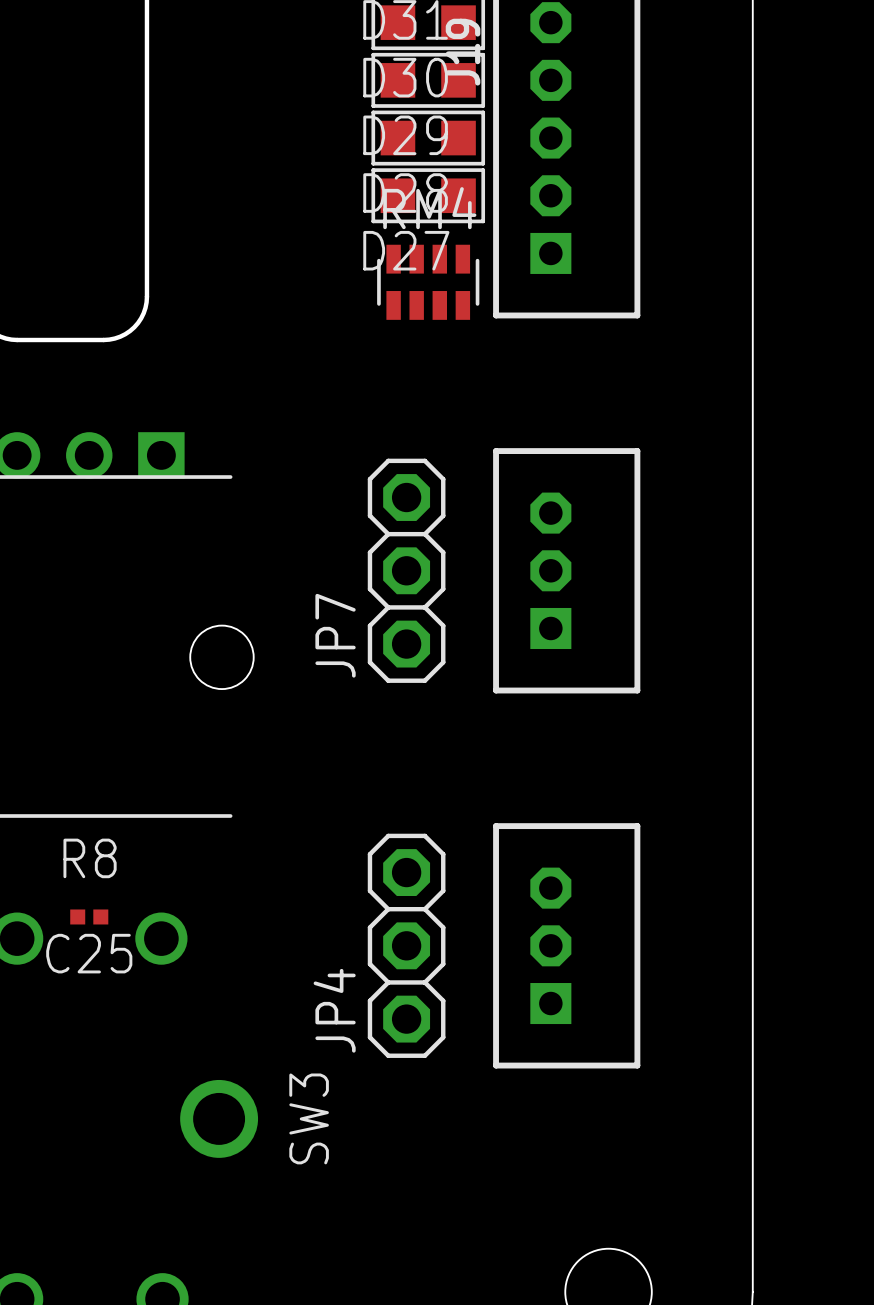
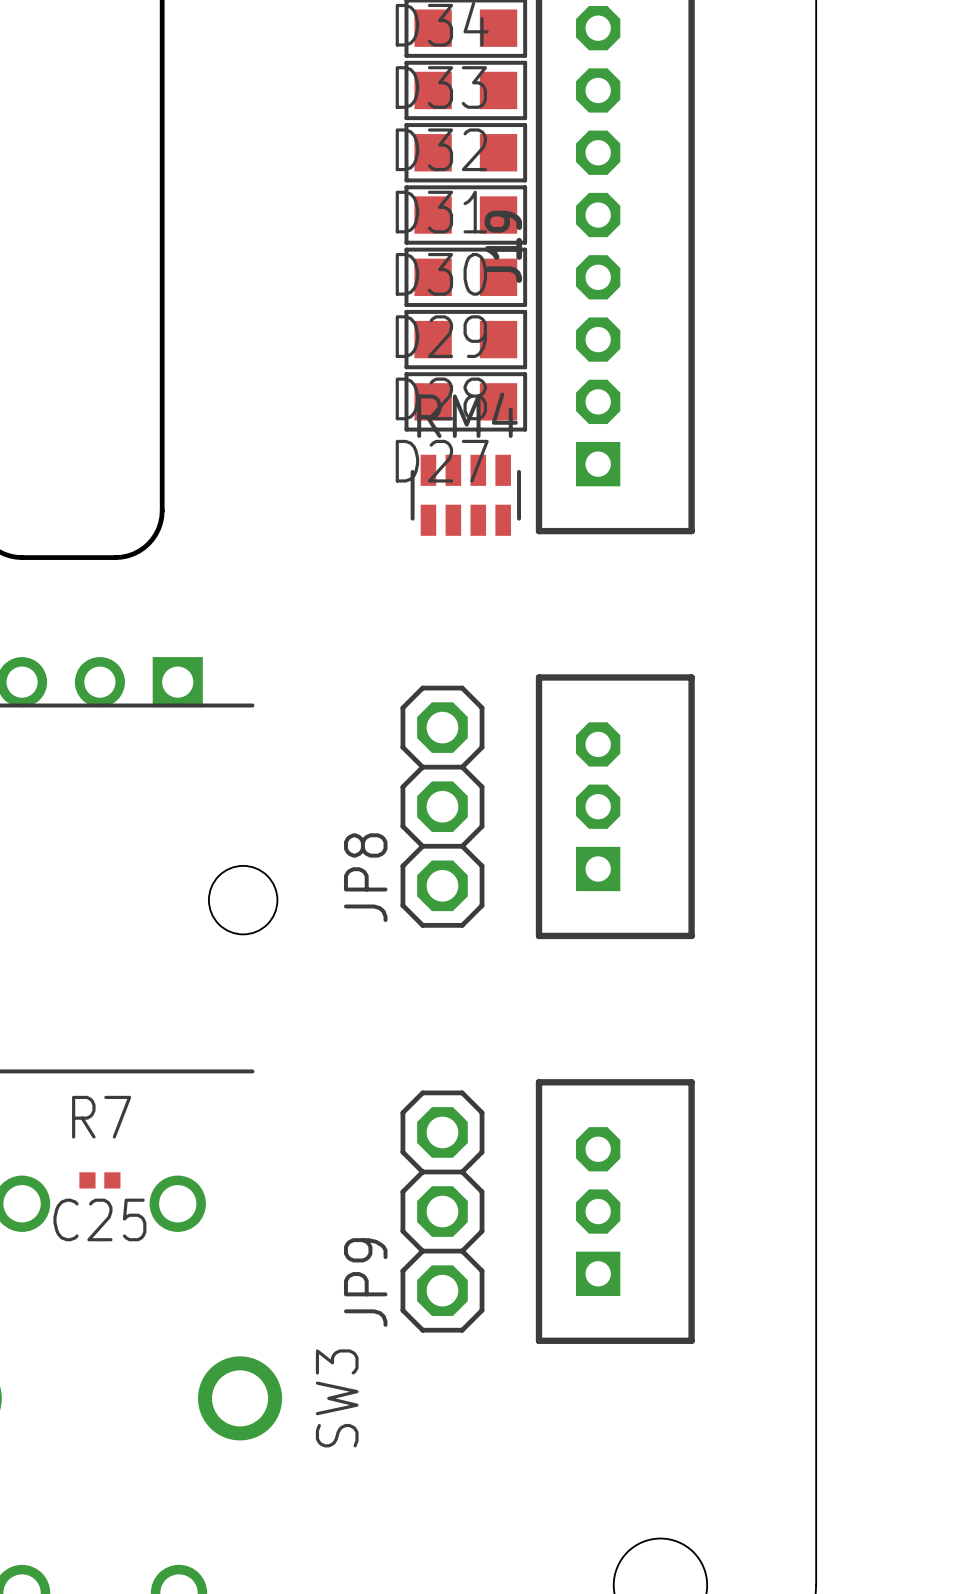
JP7 name: JP7 (335, 635) -> JP8 (365, 877)
R8 name: R8 (90, 858) -> R7 (101, 1117)
JP4 name: JP4 (334, 1010) -> JP9 (365, 1282)

